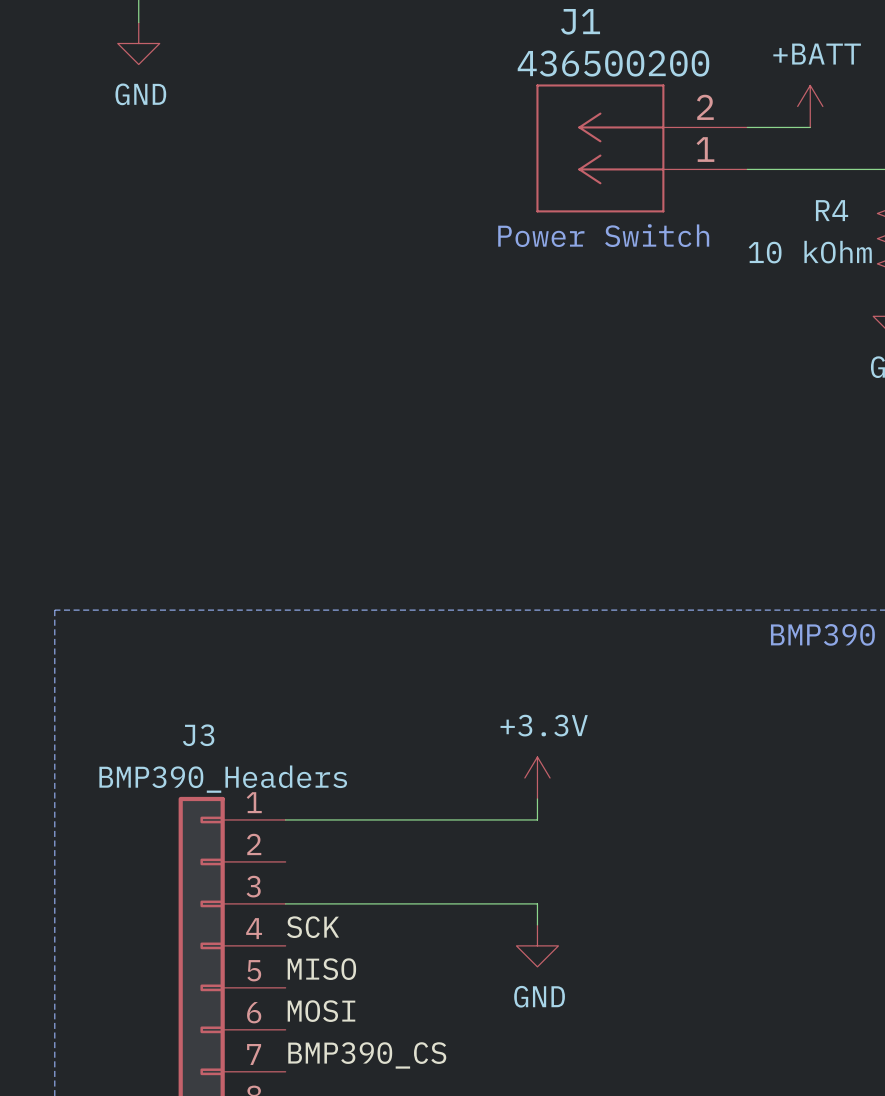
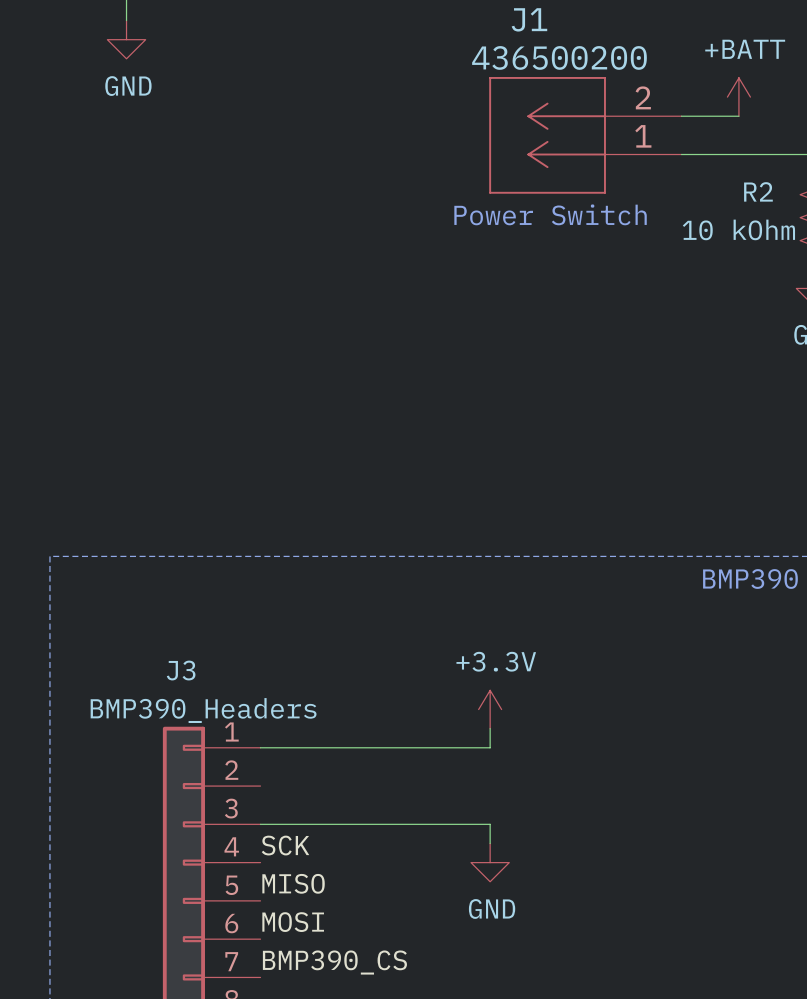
R4 name: R4 (832, 210) -> R2 (758, 191)

